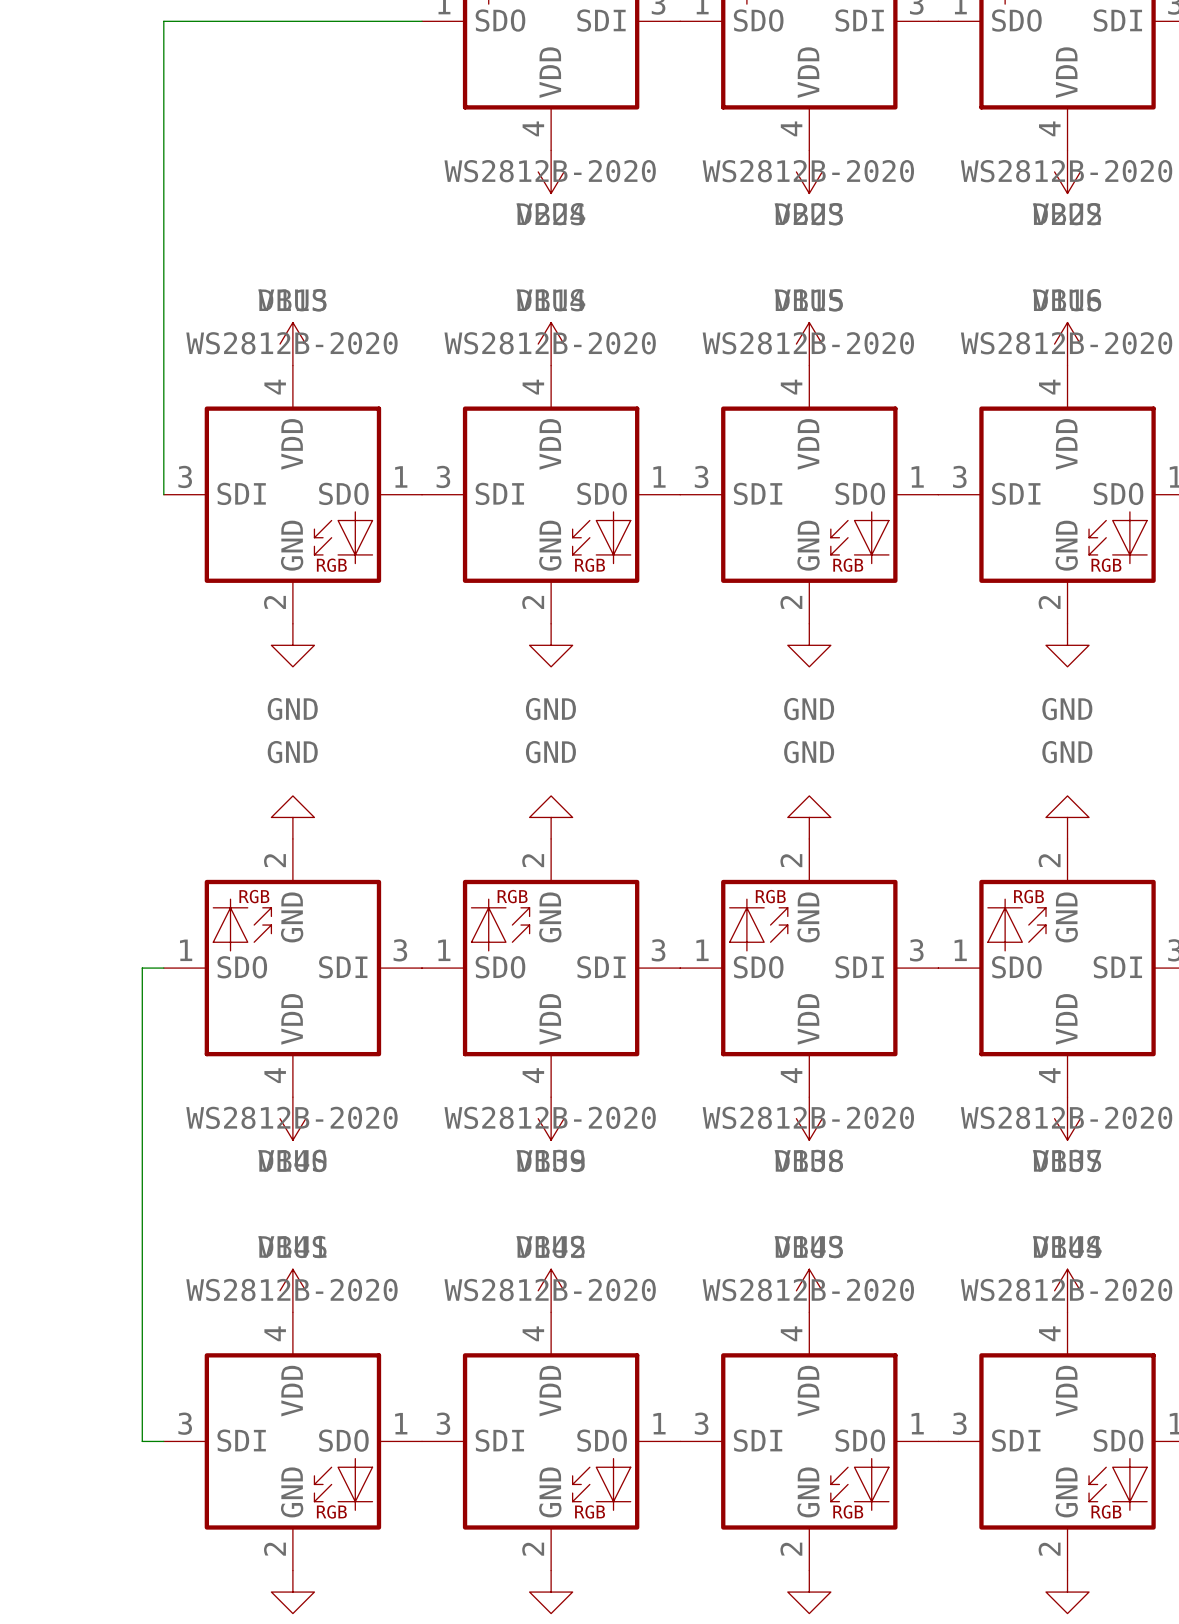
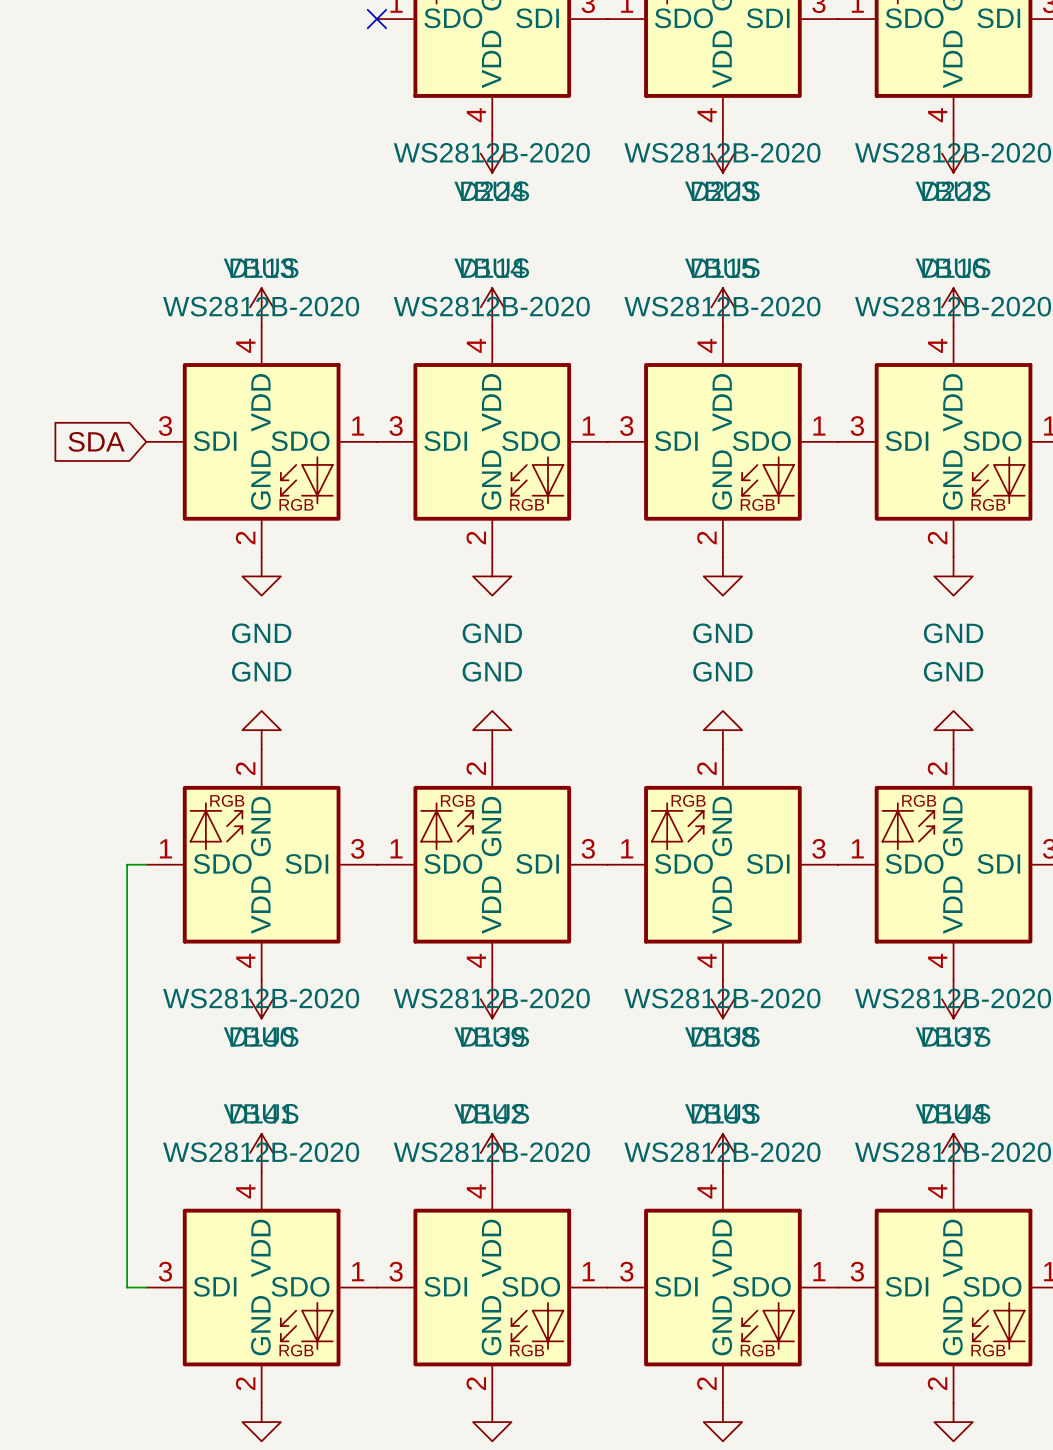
wire: (422, 21) (163, 21) (163, 494) -> none
no-connect mark: none -> (376, 19)
global label: none -> SDA (96, 441)

